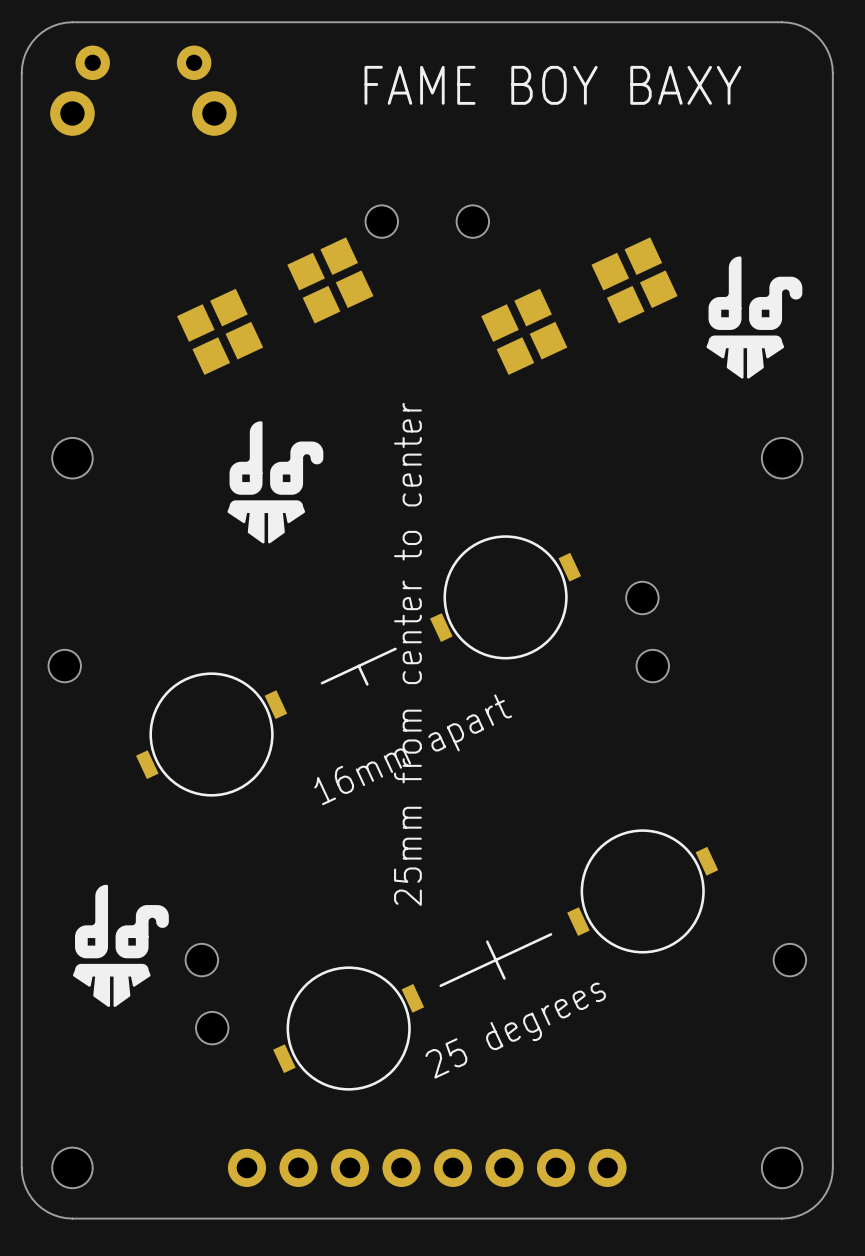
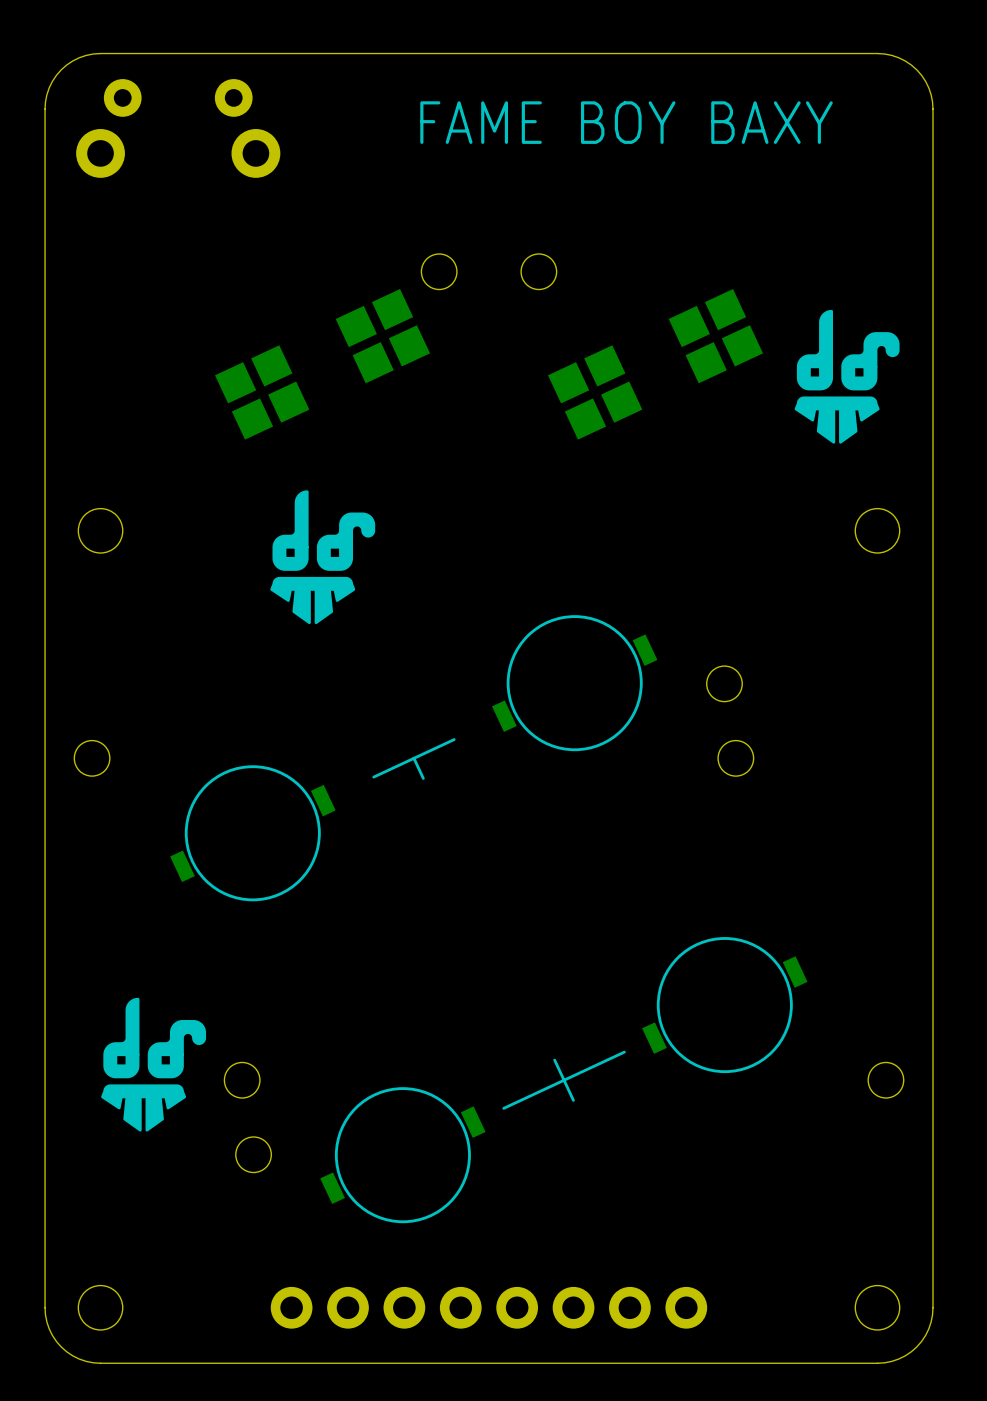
text: 25mm from center to center (407, 654) -> none
text: 16mm apart (413, 749) -> none
text: 25 degrees (515, 1030) -> none

